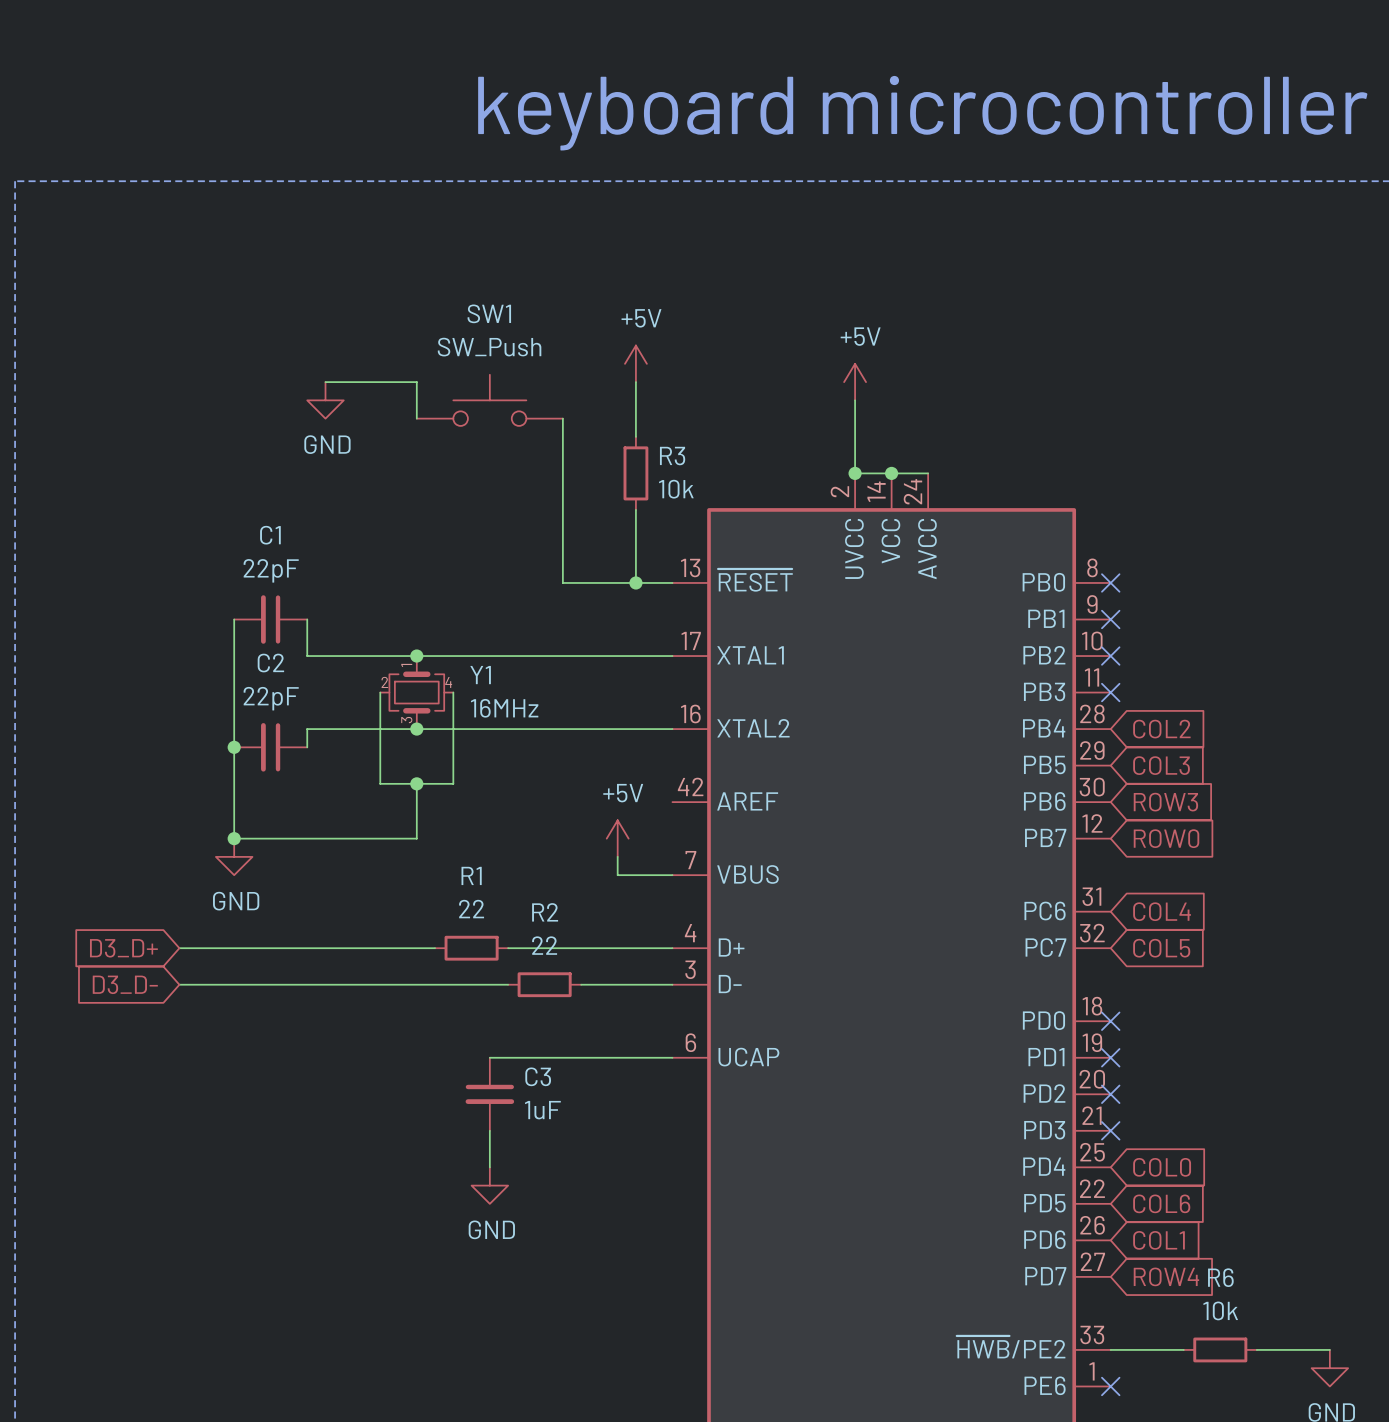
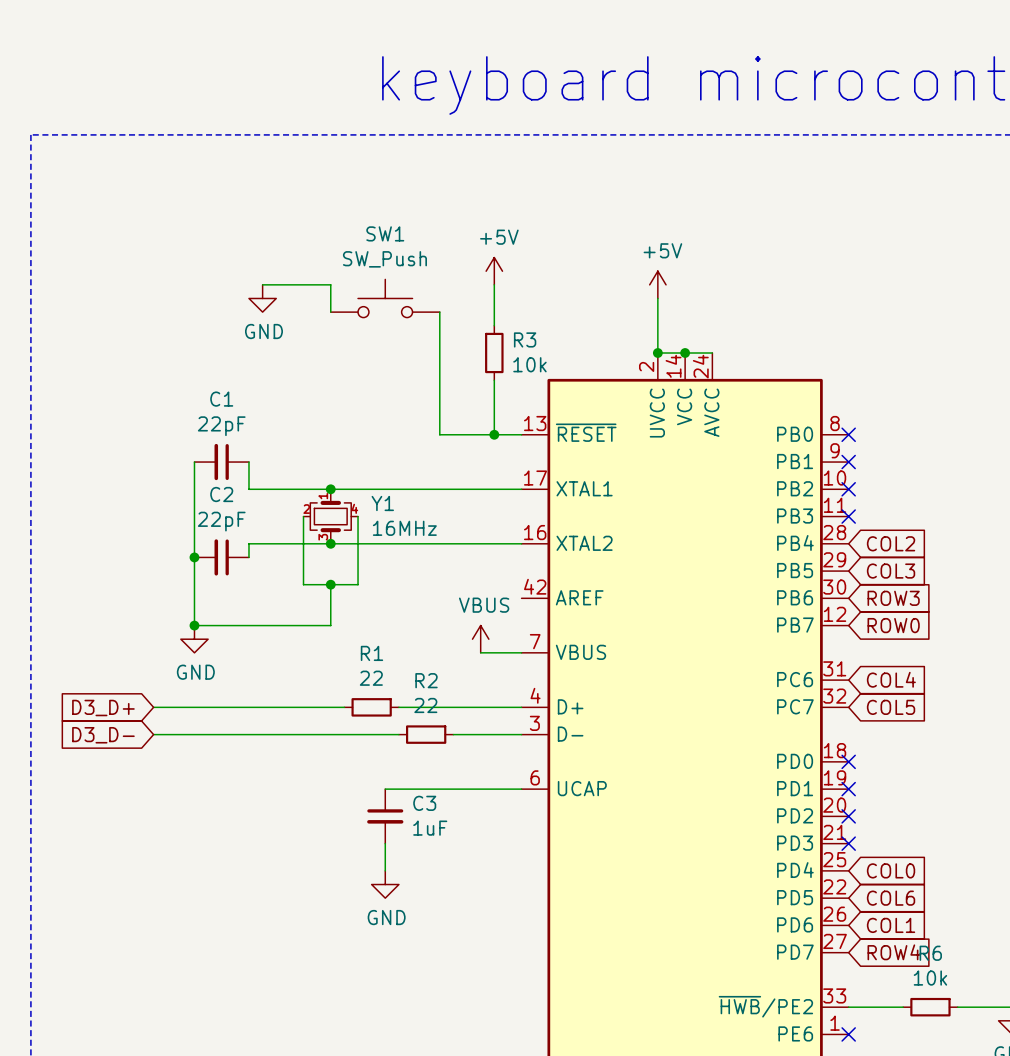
power symbol: +5V (617, 838) -> none
power symbol: none -> VBUS (480, 639)

